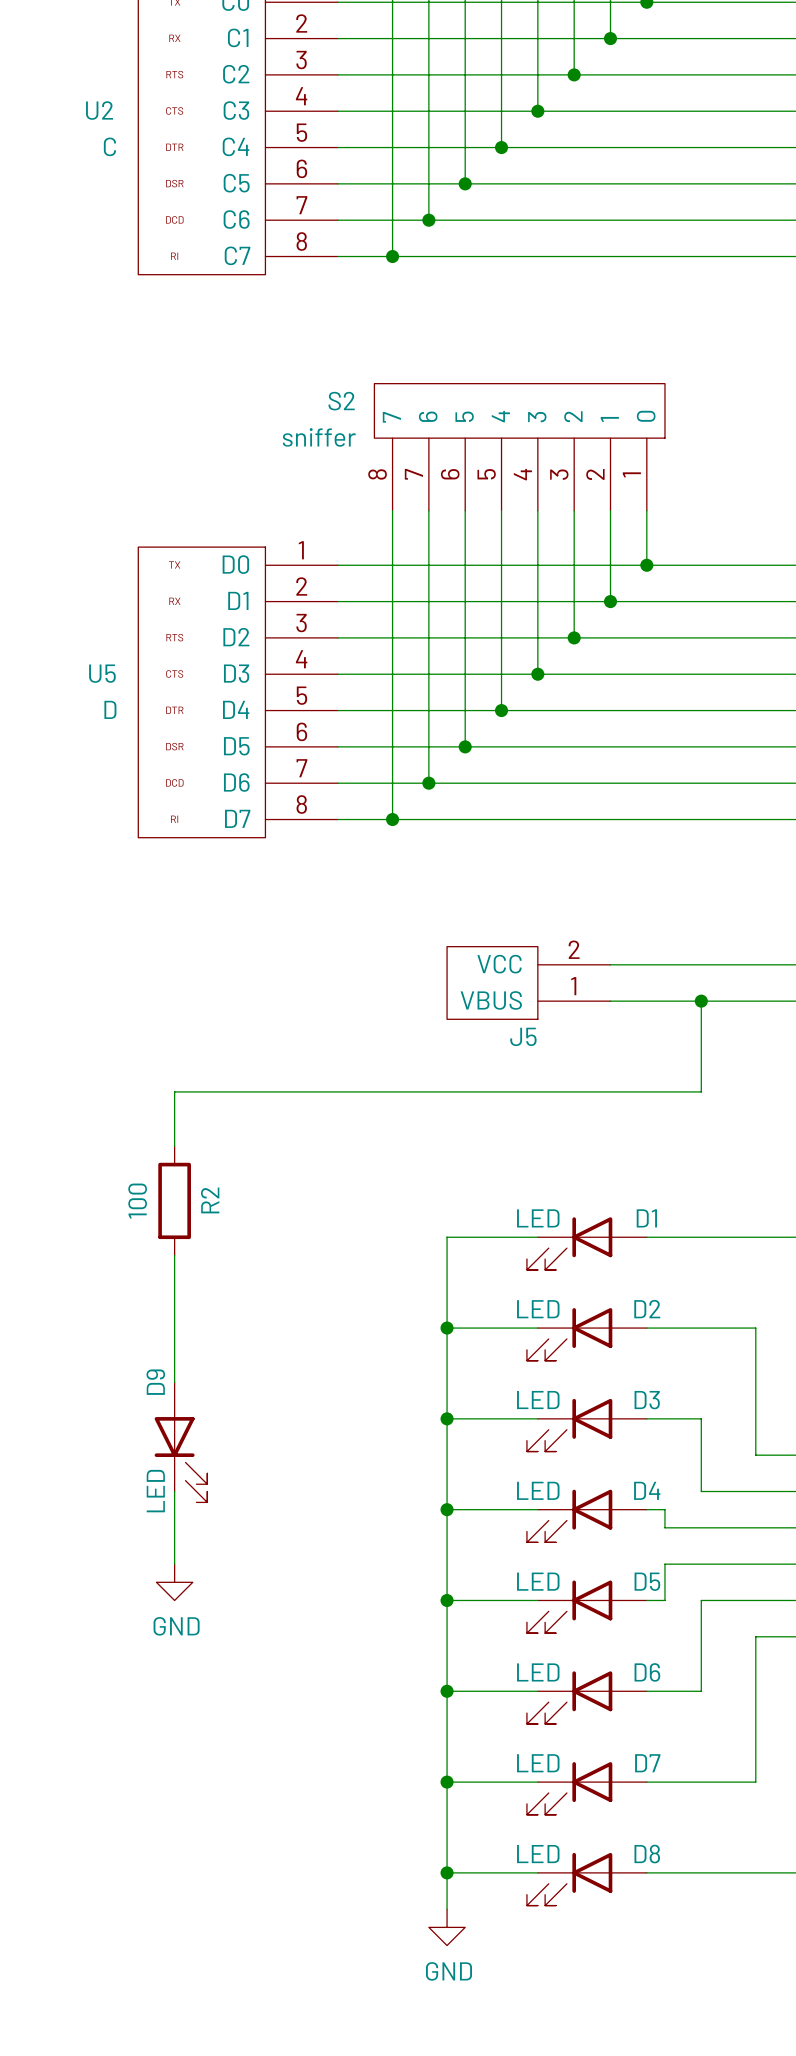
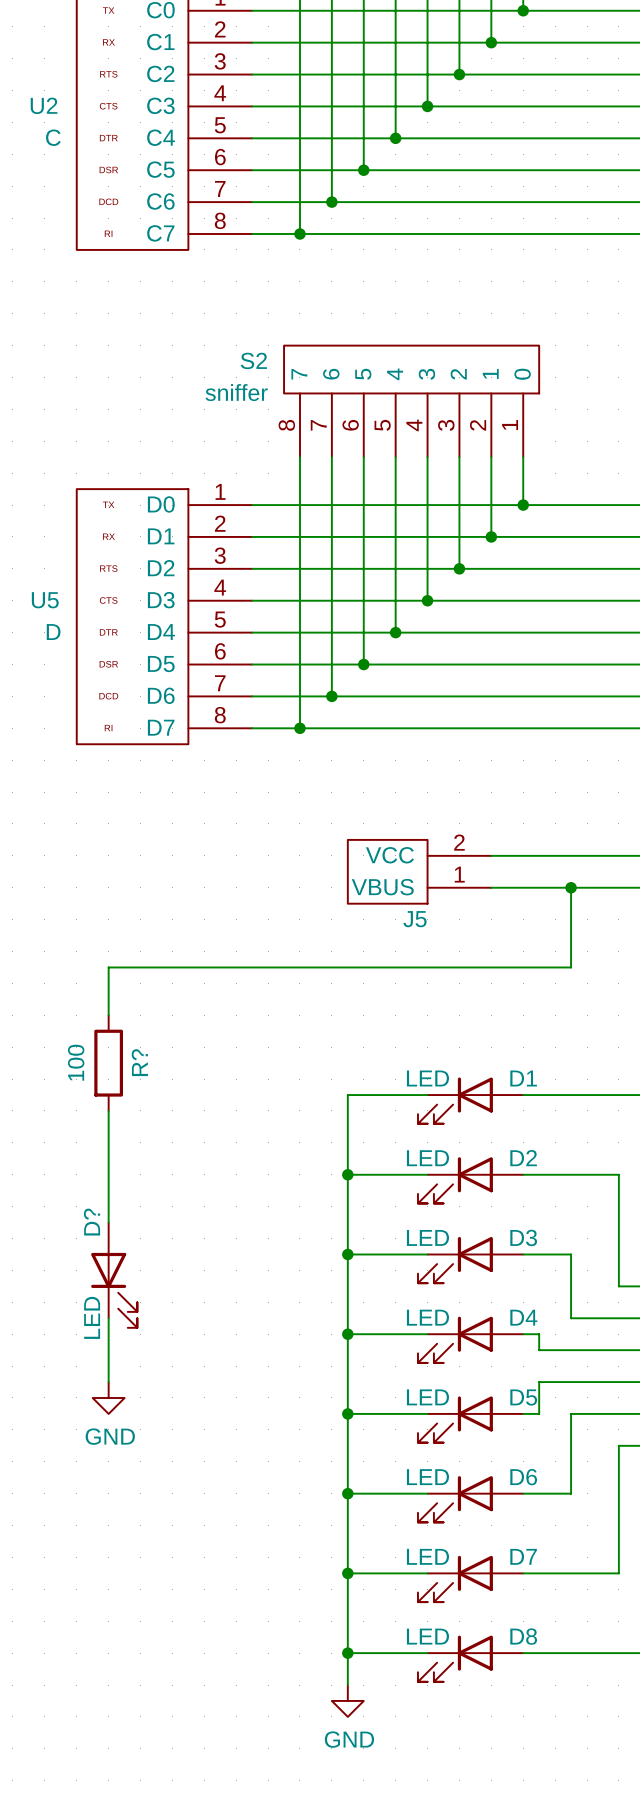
R2 name: R2 (210, 1200) -> R? (139, 1062)
D9 name: D9 (155, 1382) -> D? (91, 1222)

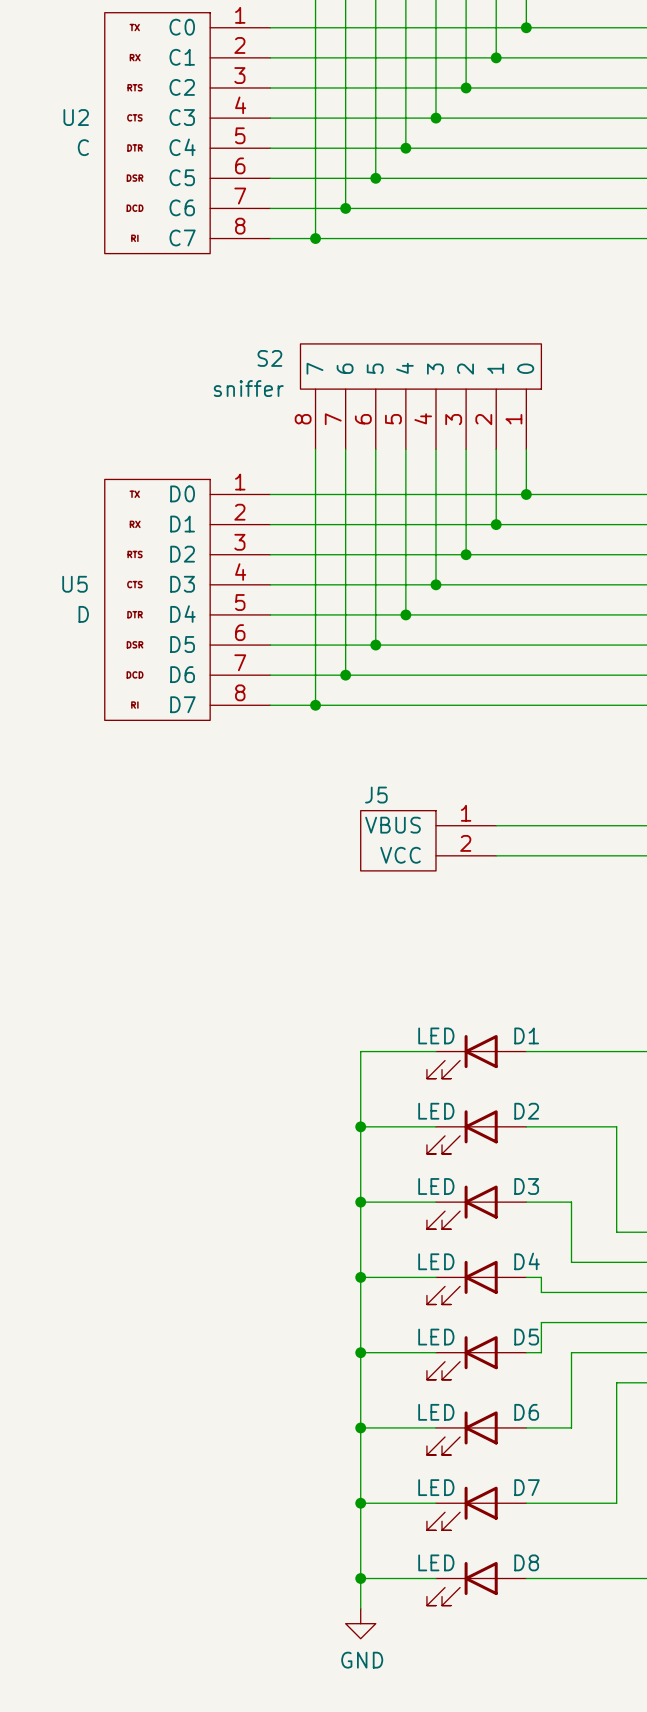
J5 flip: as is (387, 871) -> up-down (398, 840)
wire: (571, 887) (571, 967) (108, 967) (108, 1015) -> none
junction: (571, 887) -> none
J5 name position: J5 (415, 919) -> J5 (376, 795)
R?: 100 (108, 1063) -> none
wire: (108, 1110) (108, 1222) -> none
D?: LED (114, 1275) -> none
wire: (108, 1318) (108, 1382) -> none
power symbol: GND (108, 1397) -> none

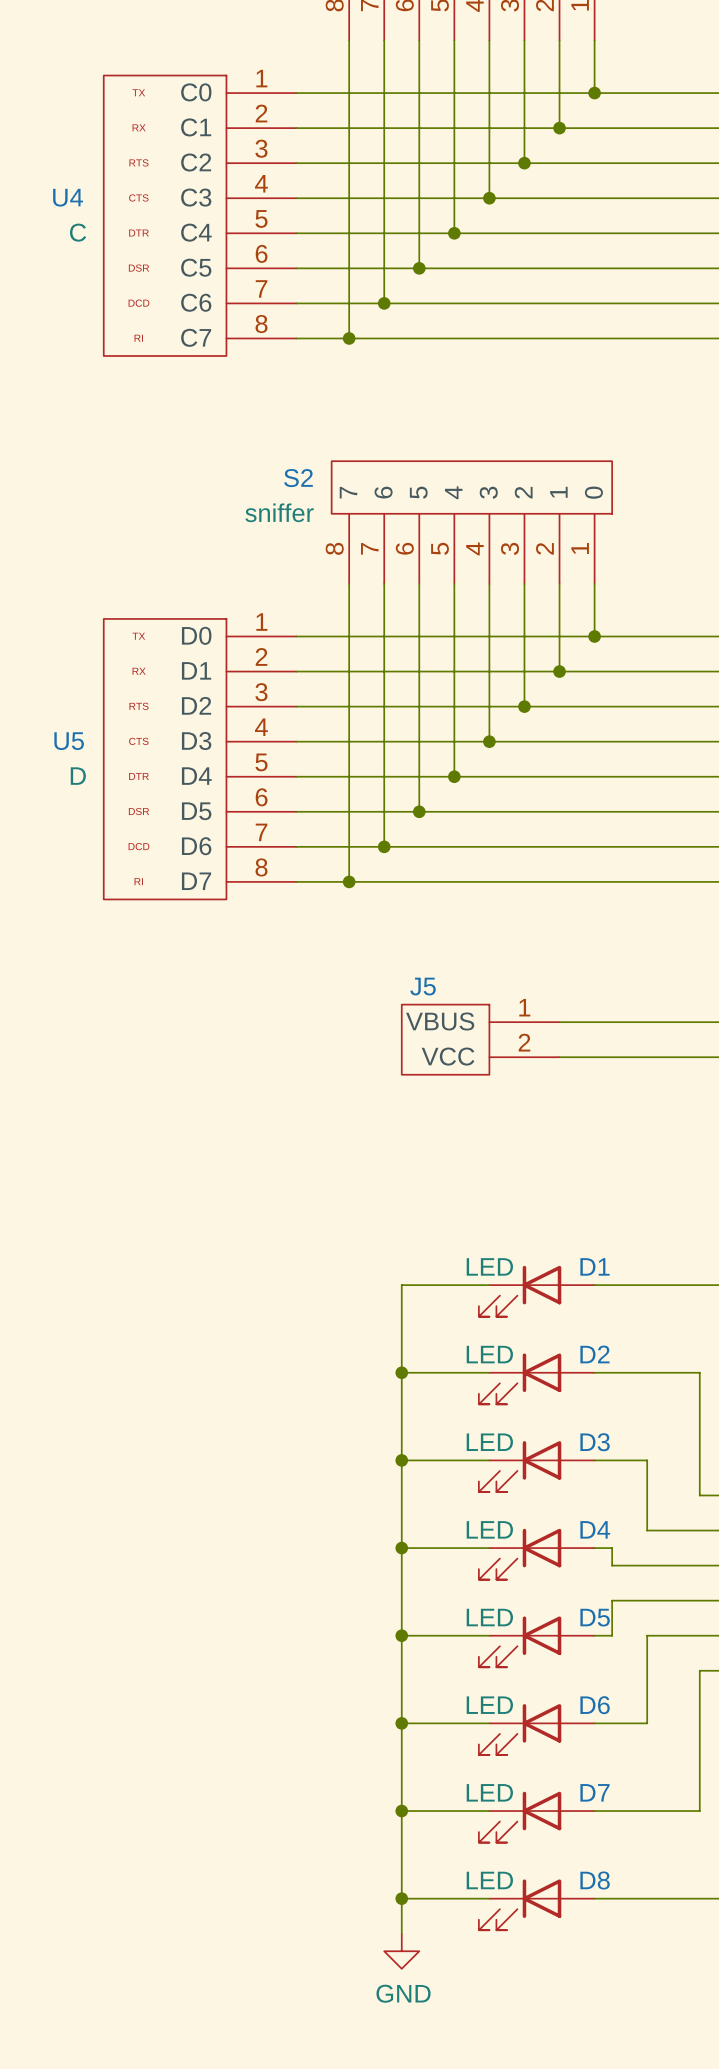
U2 name: U2 (76, 117) -> U4 (68, 197)

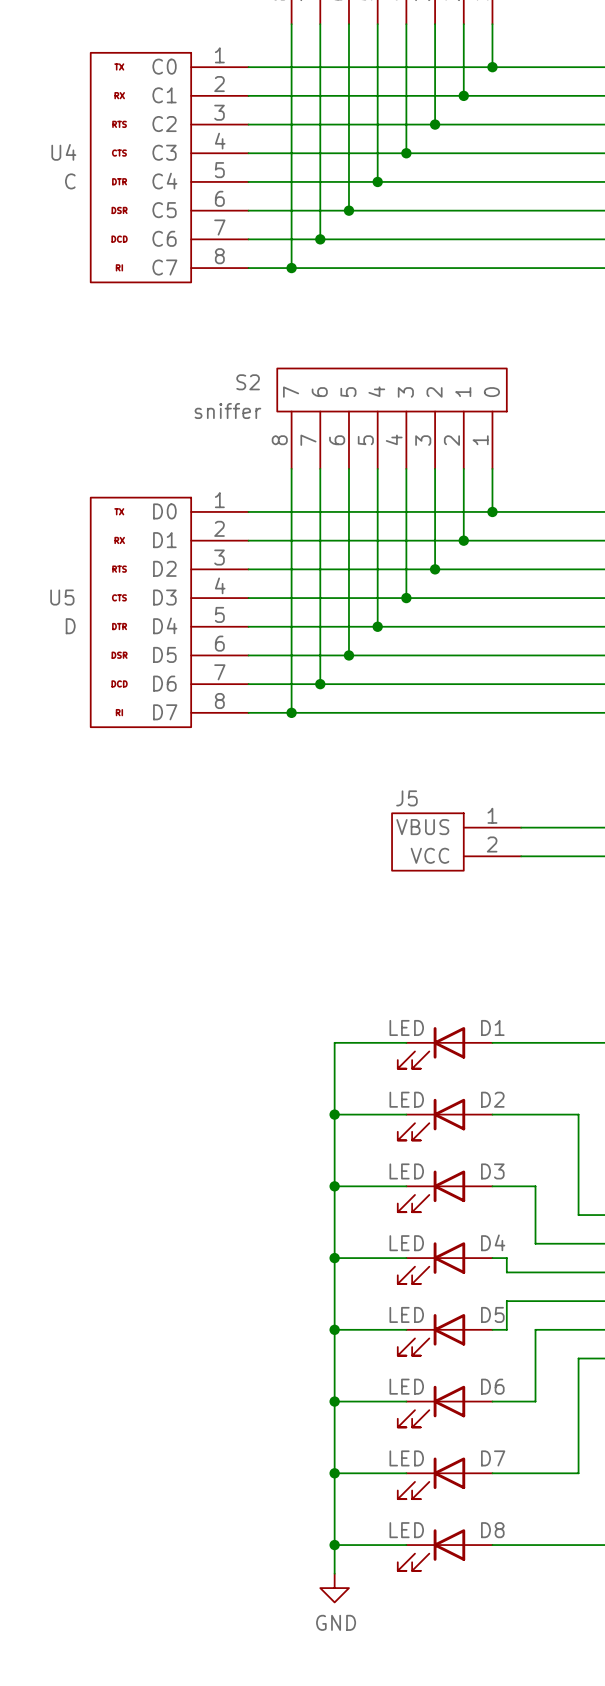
J5 position: (480, 1039) -> (456, 841)

